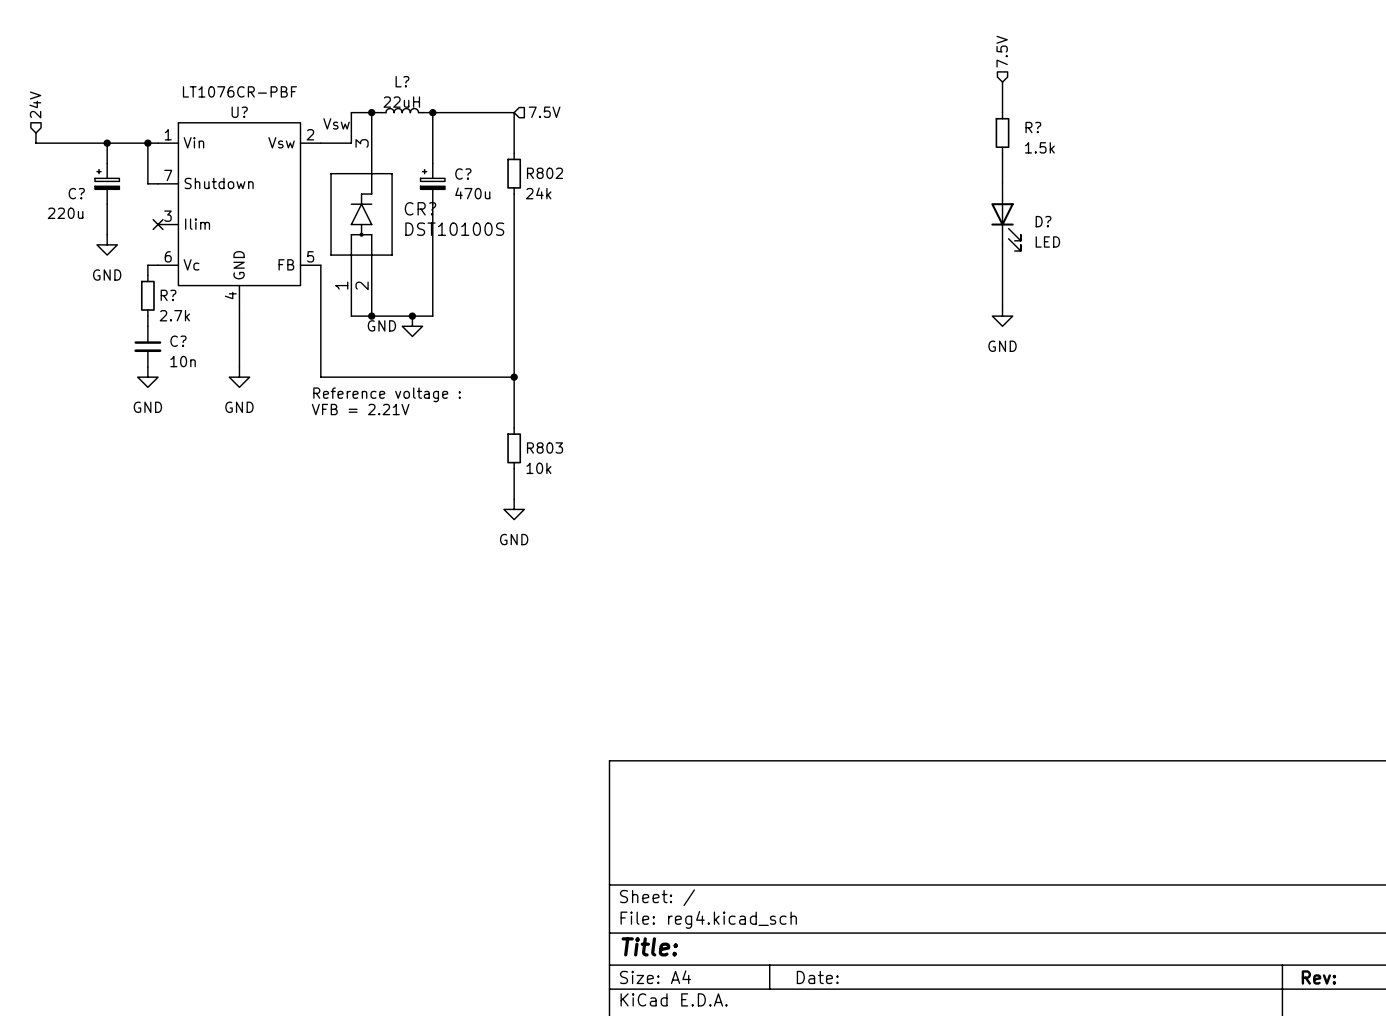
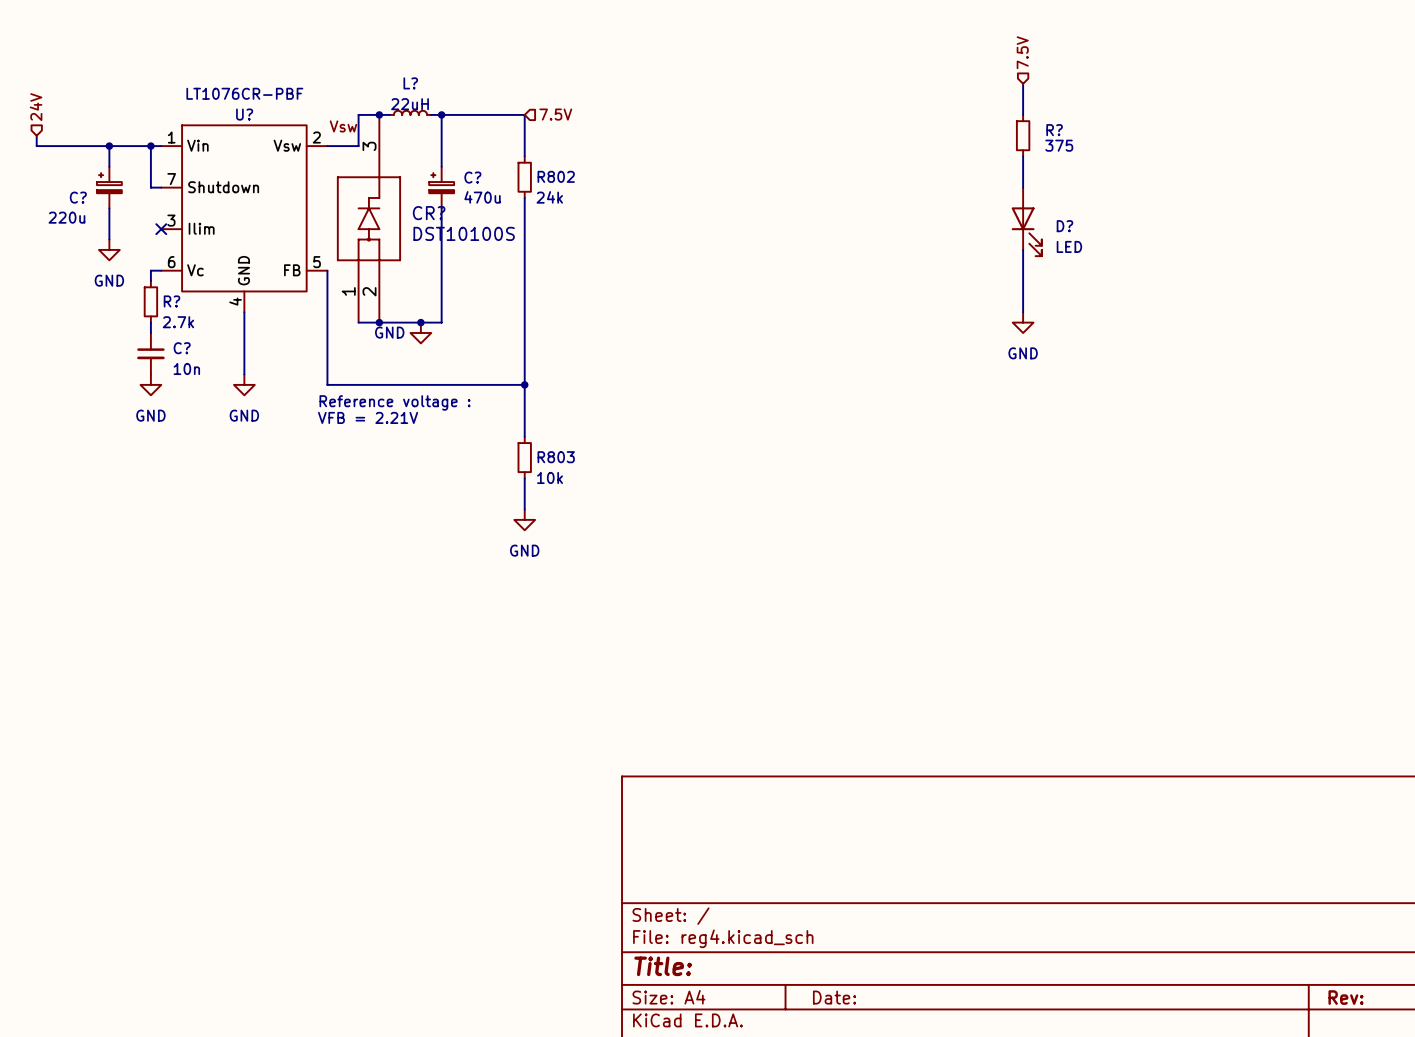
R? value: 1.5k (1039, 147) -> 375 (1059, 145)

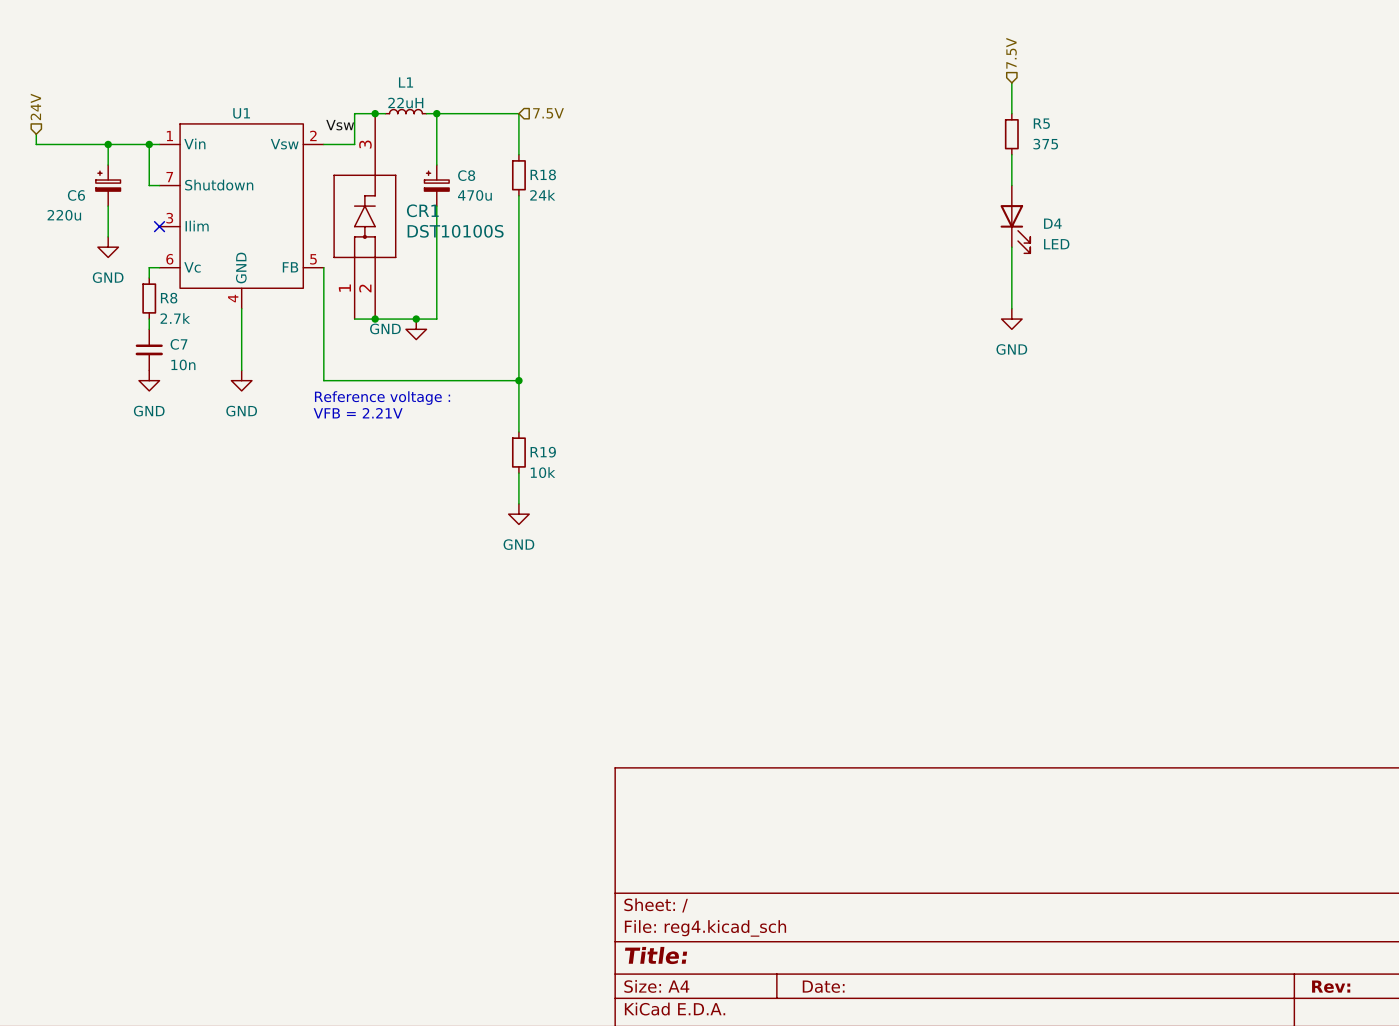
L? name: L? (410, 83) -> L1 (406, 82)
U? value: LT1076CR-PBF (244, 93) -> none
U? name: U? (244, 114) -> U1 (241, 113)
R? name: R? (1054, 130) -> R5 (1041, 123)
R802 name: R802 (556, 176) -> R18 (543, 174)
C? name: C? (472, 177) -> C8 (466, 175)
C? name: C? (78, 197) -> C6 (76, 195)
CR? name: CR? (429, 213) -> CR1 (422, 210)
D? name: D? (1064, 226) -> D4 (1052, 223)
R? name: R? (172, 301) -> R8 (169, 298)
C? name: C? (182, 348) -> C7 (178, 344)
R803 name: R803 (556, 457) -> R19 (543, 452)

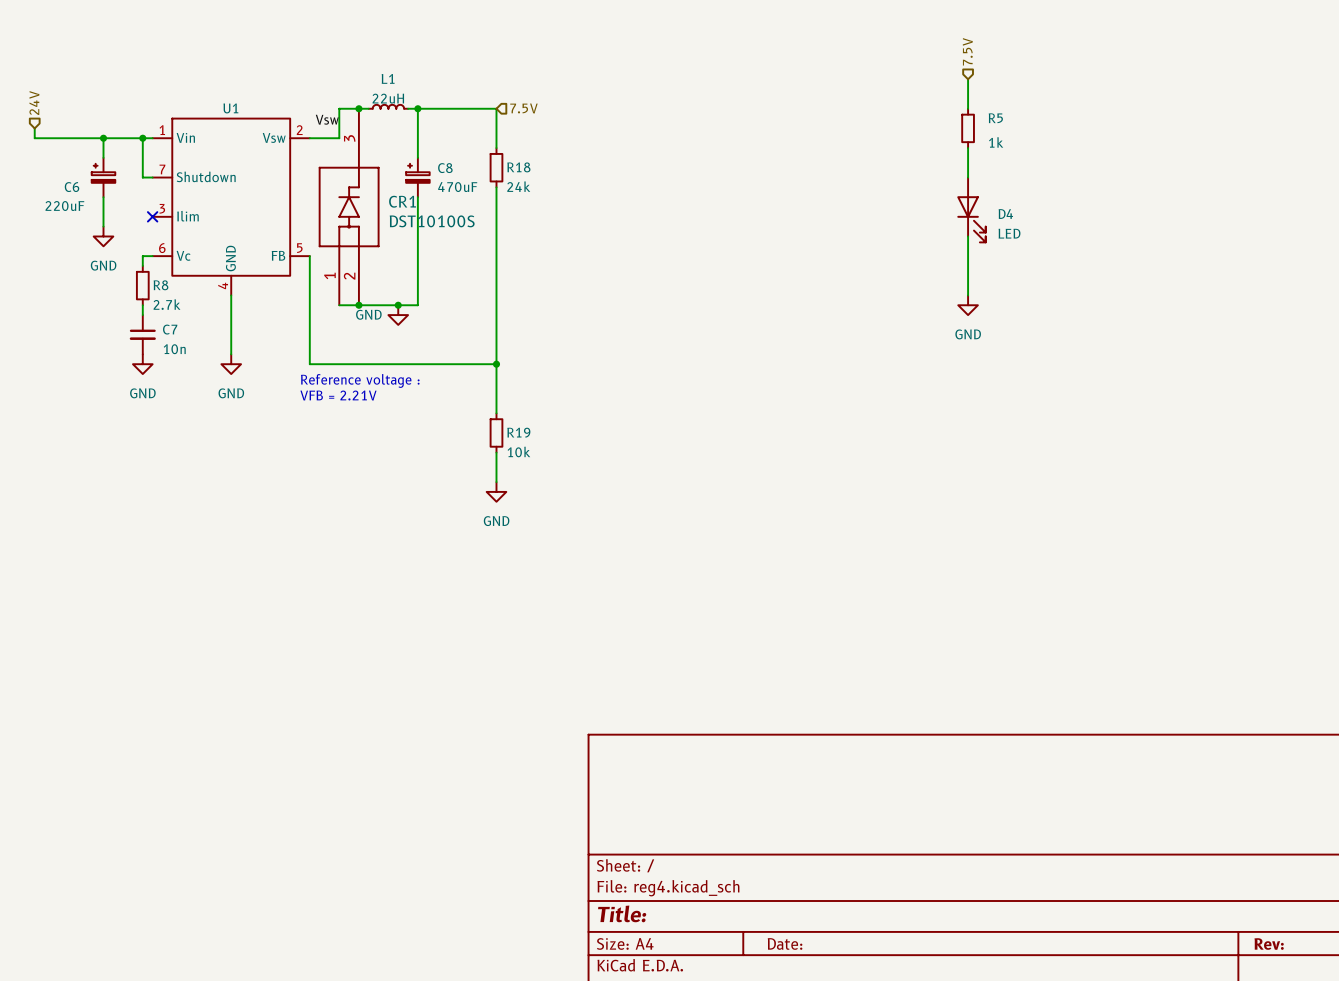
R5 value: 375 (1045, 144) -> 1k (996, 142)
C8 value: 470u (474, 195) -> 470uF (457, 187)
C6 value: 220u (64, 215) -> 220uF (64, 206)

